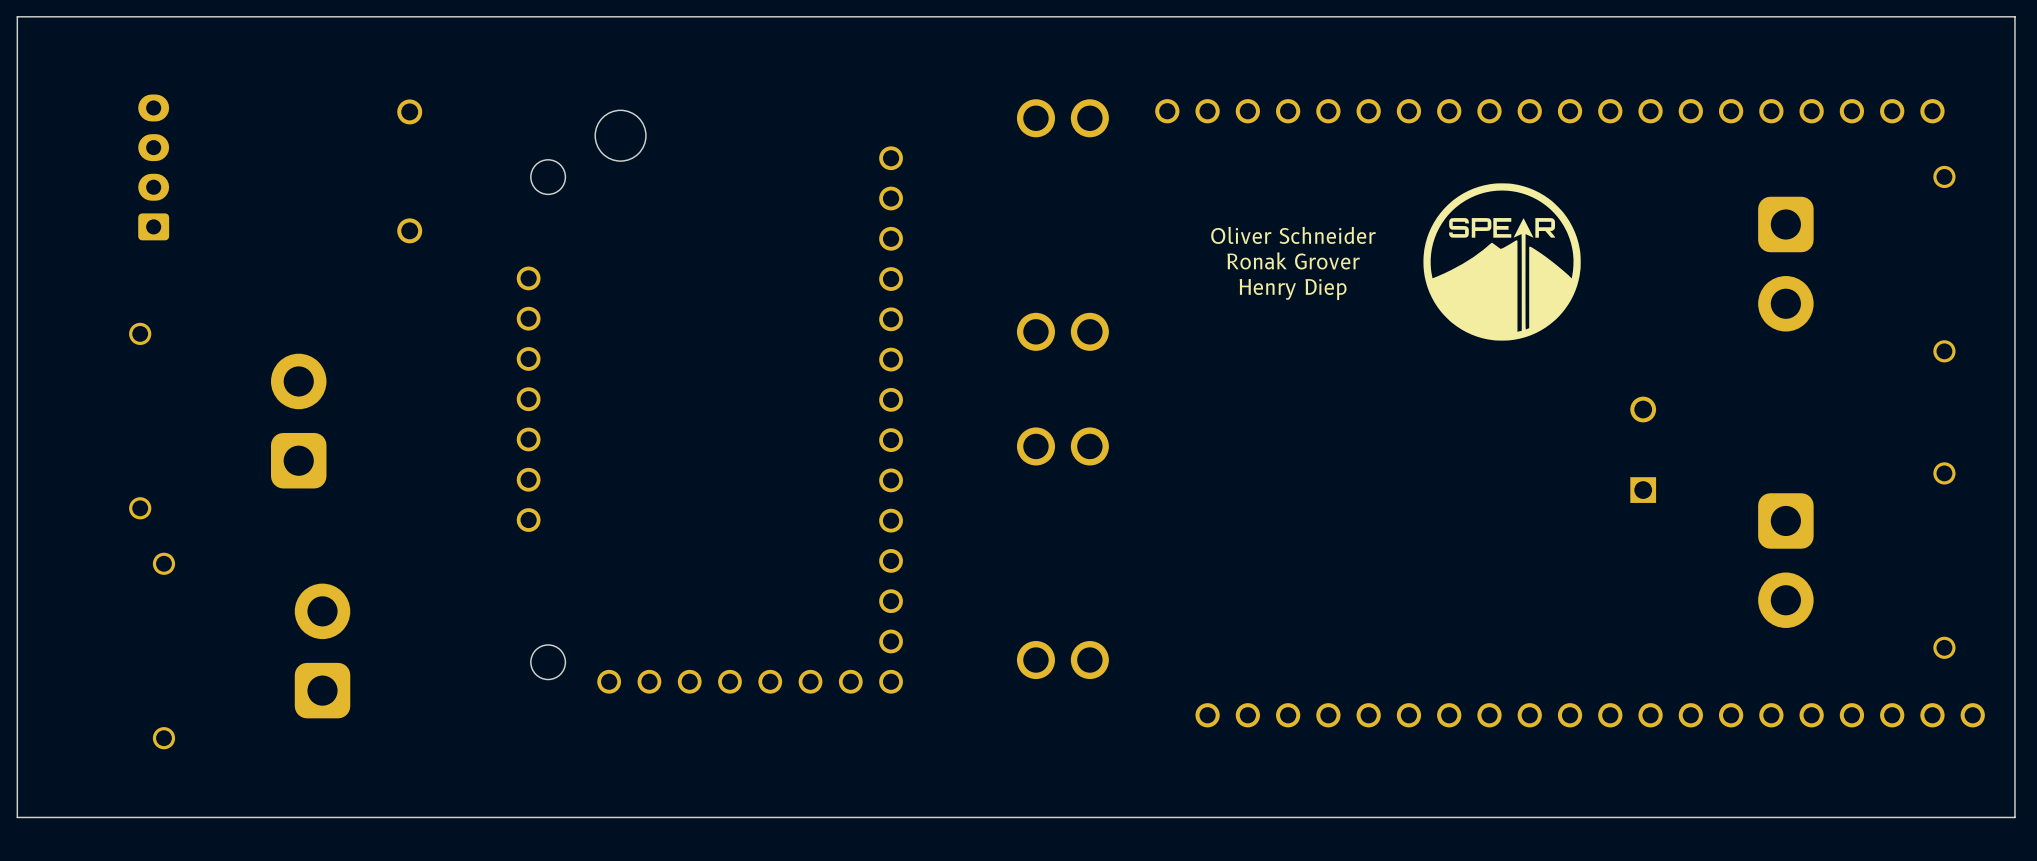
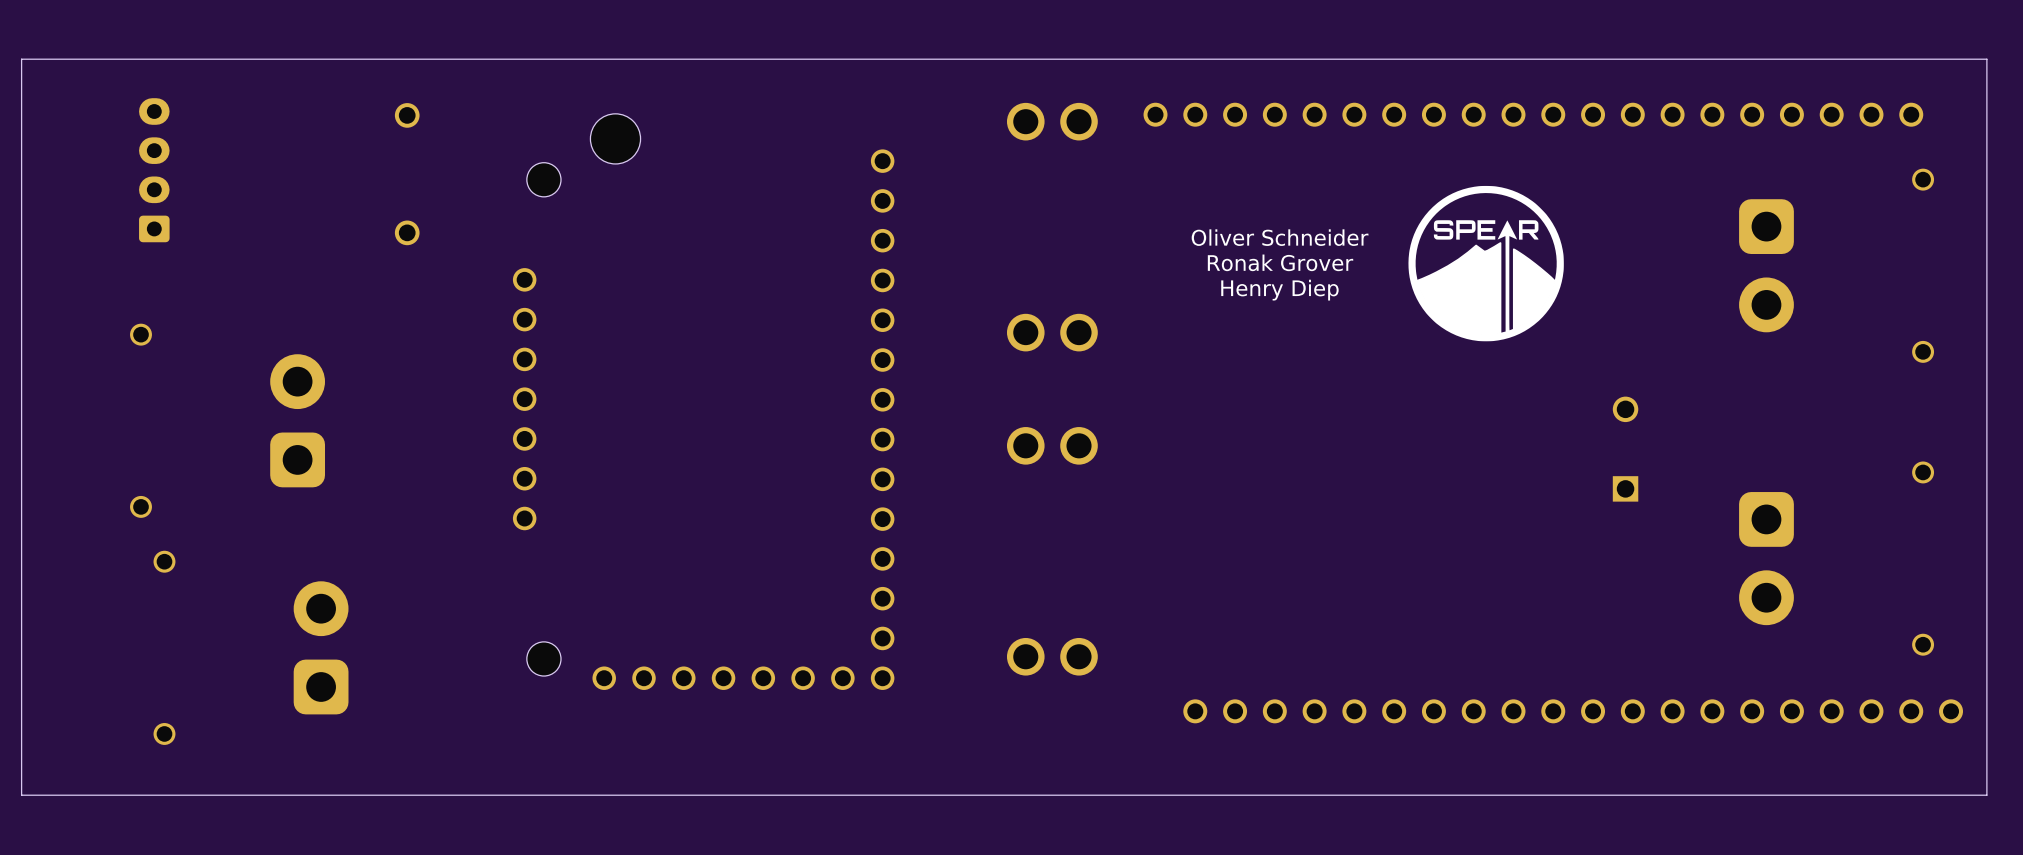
board edge: (2014, 16) (17, 16) (17, 817) (2014, 817) (2014, 16) -> (1986, 59) (1986, 795) (21, 795) (21, 59) (1986, 59)

